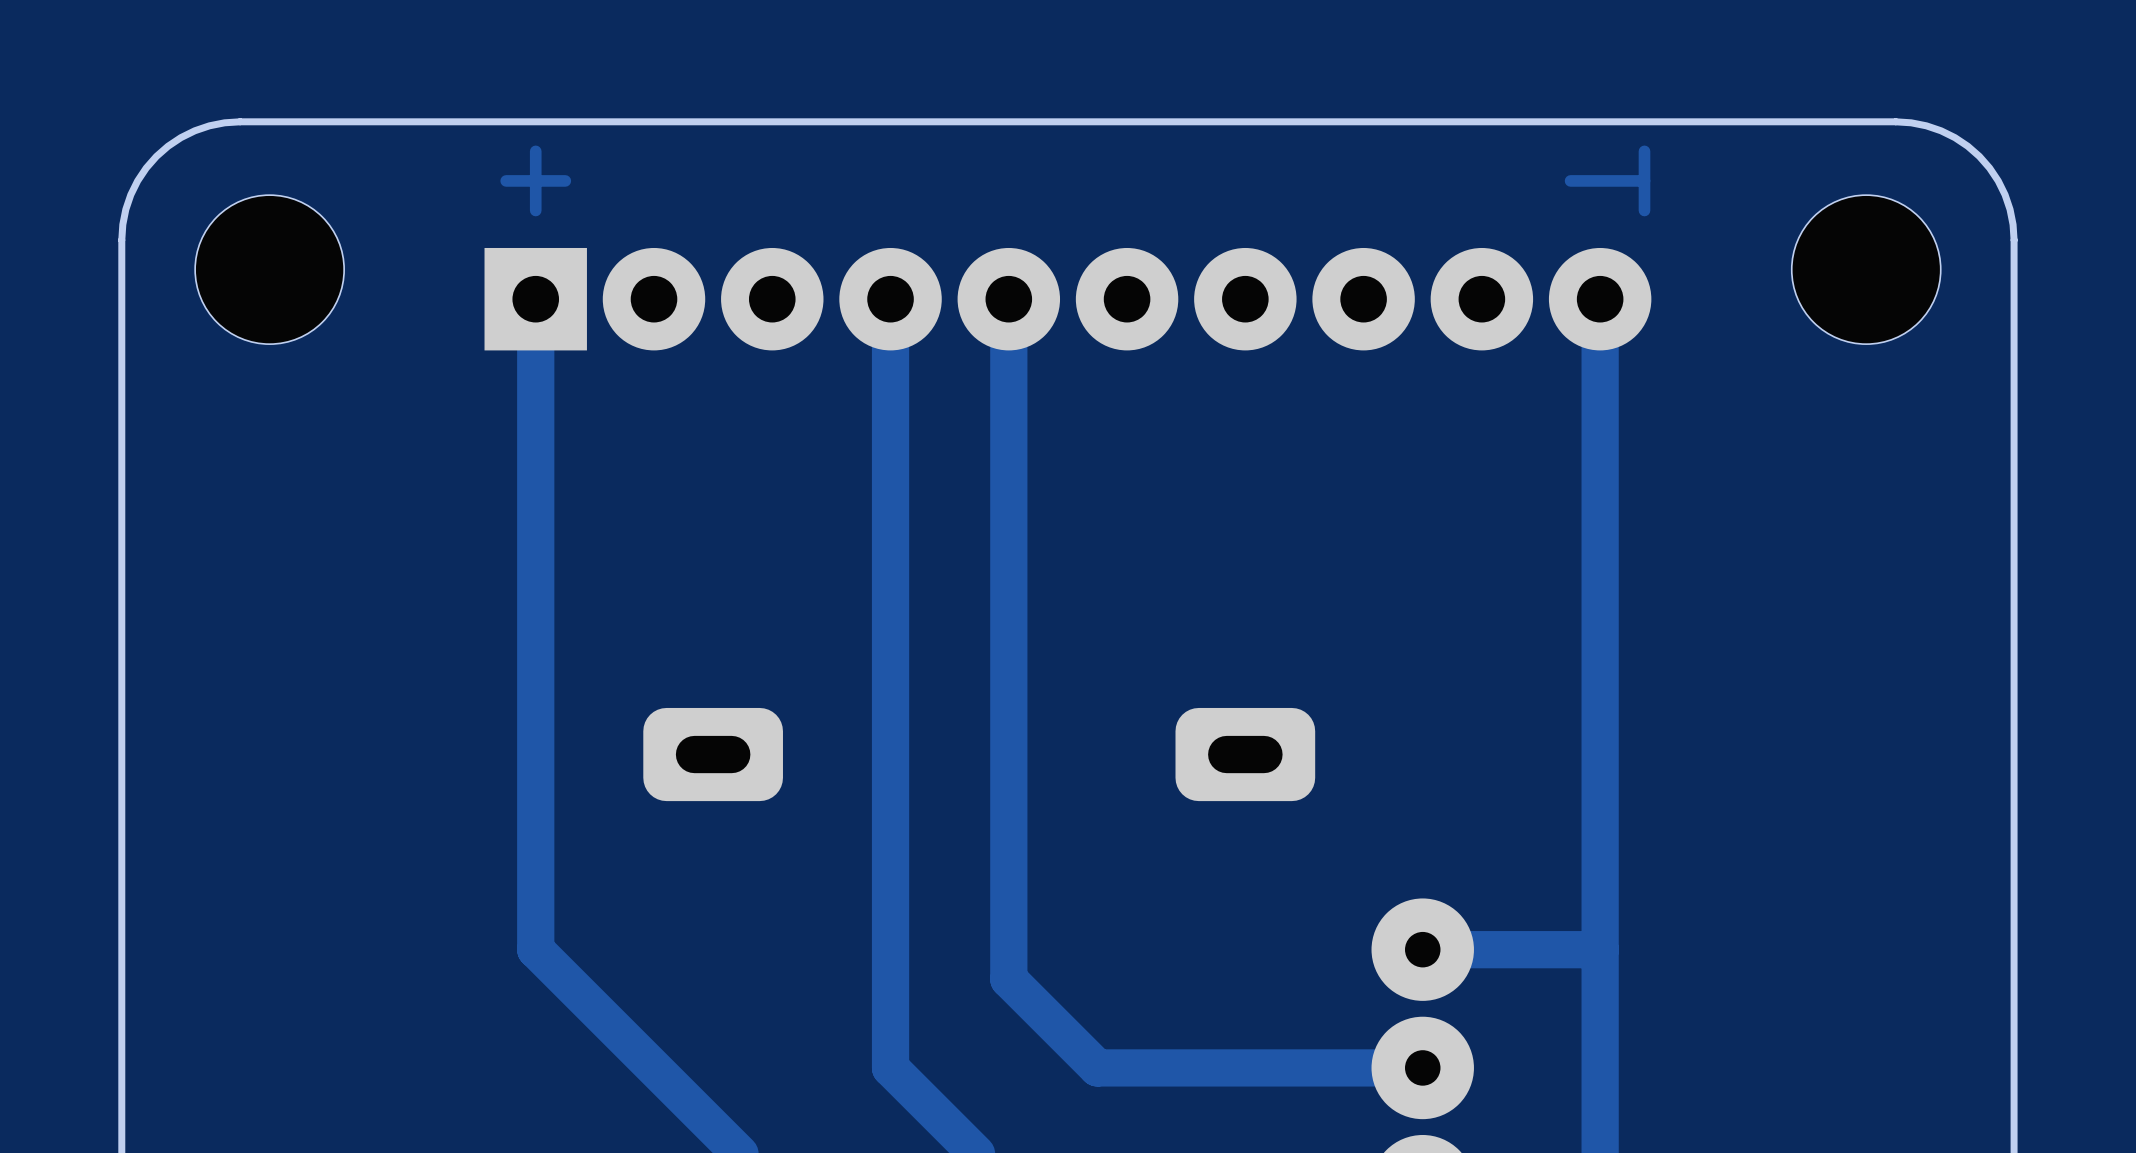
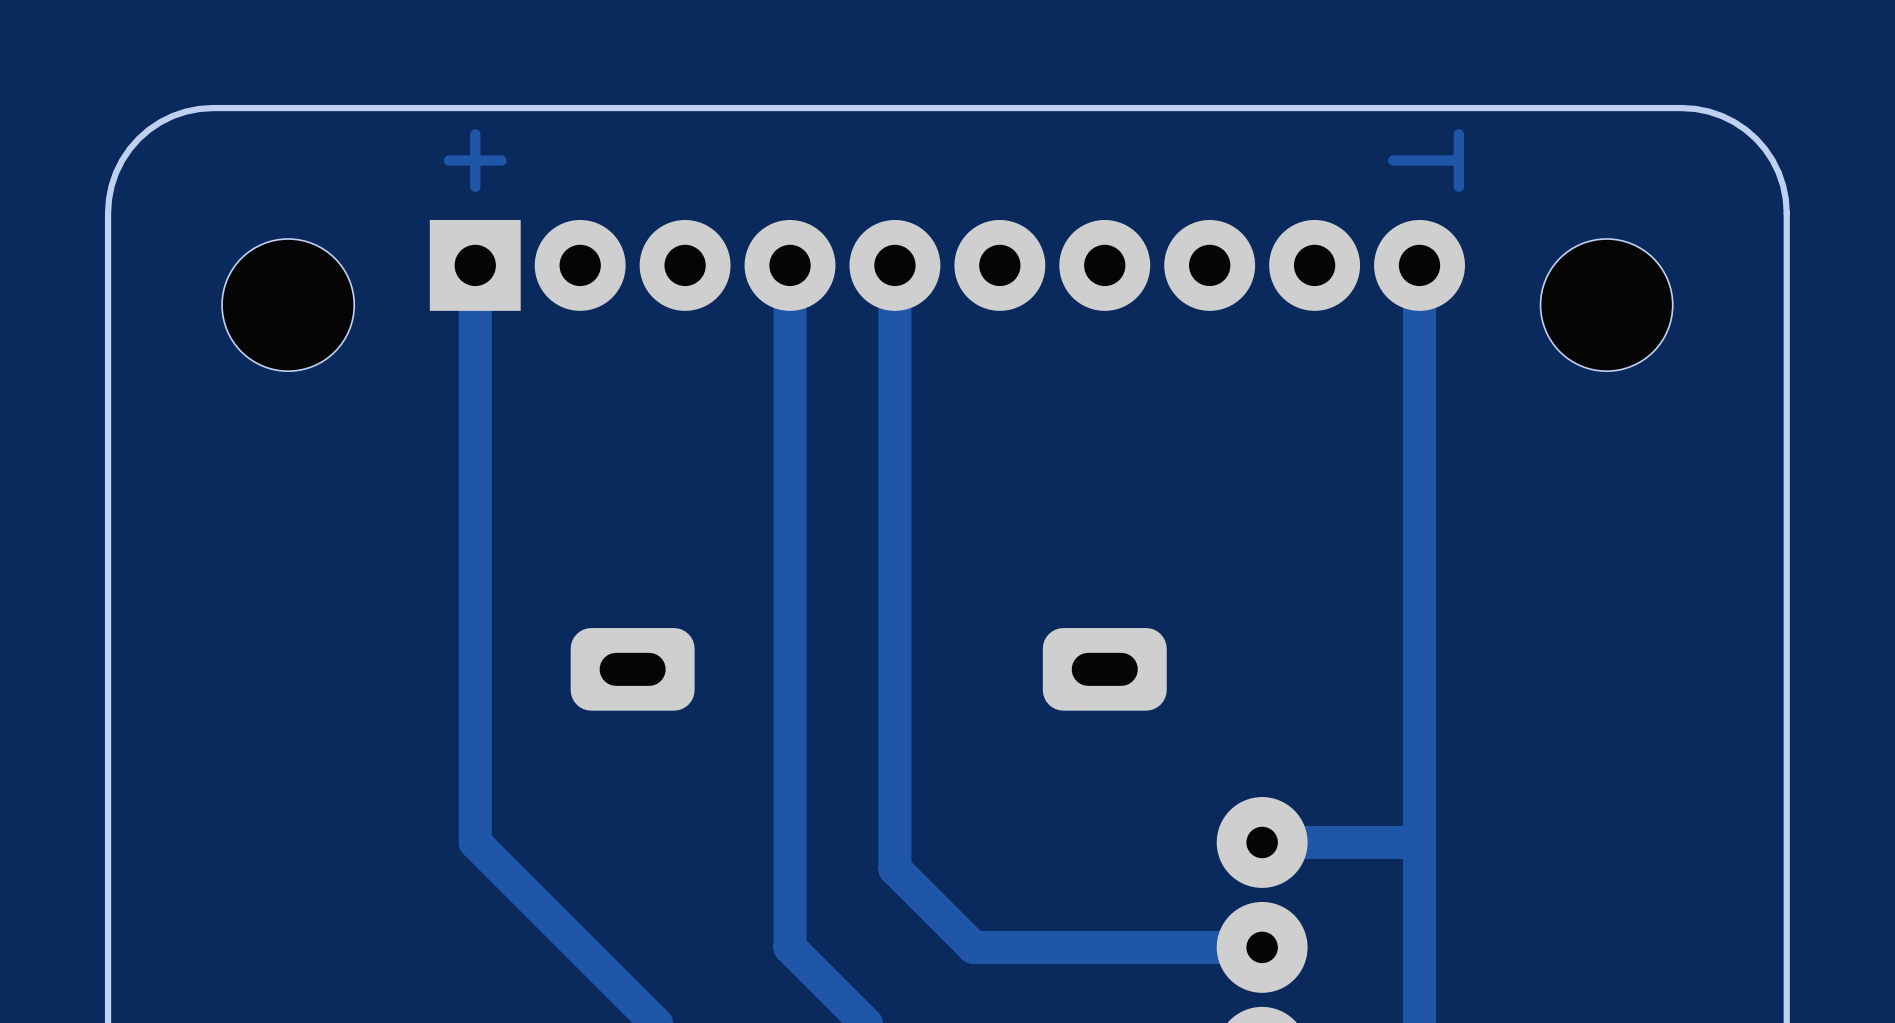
part position: (269, 269) -> (288, 305)
part position: (1866, 269) -> (1606, 305)

